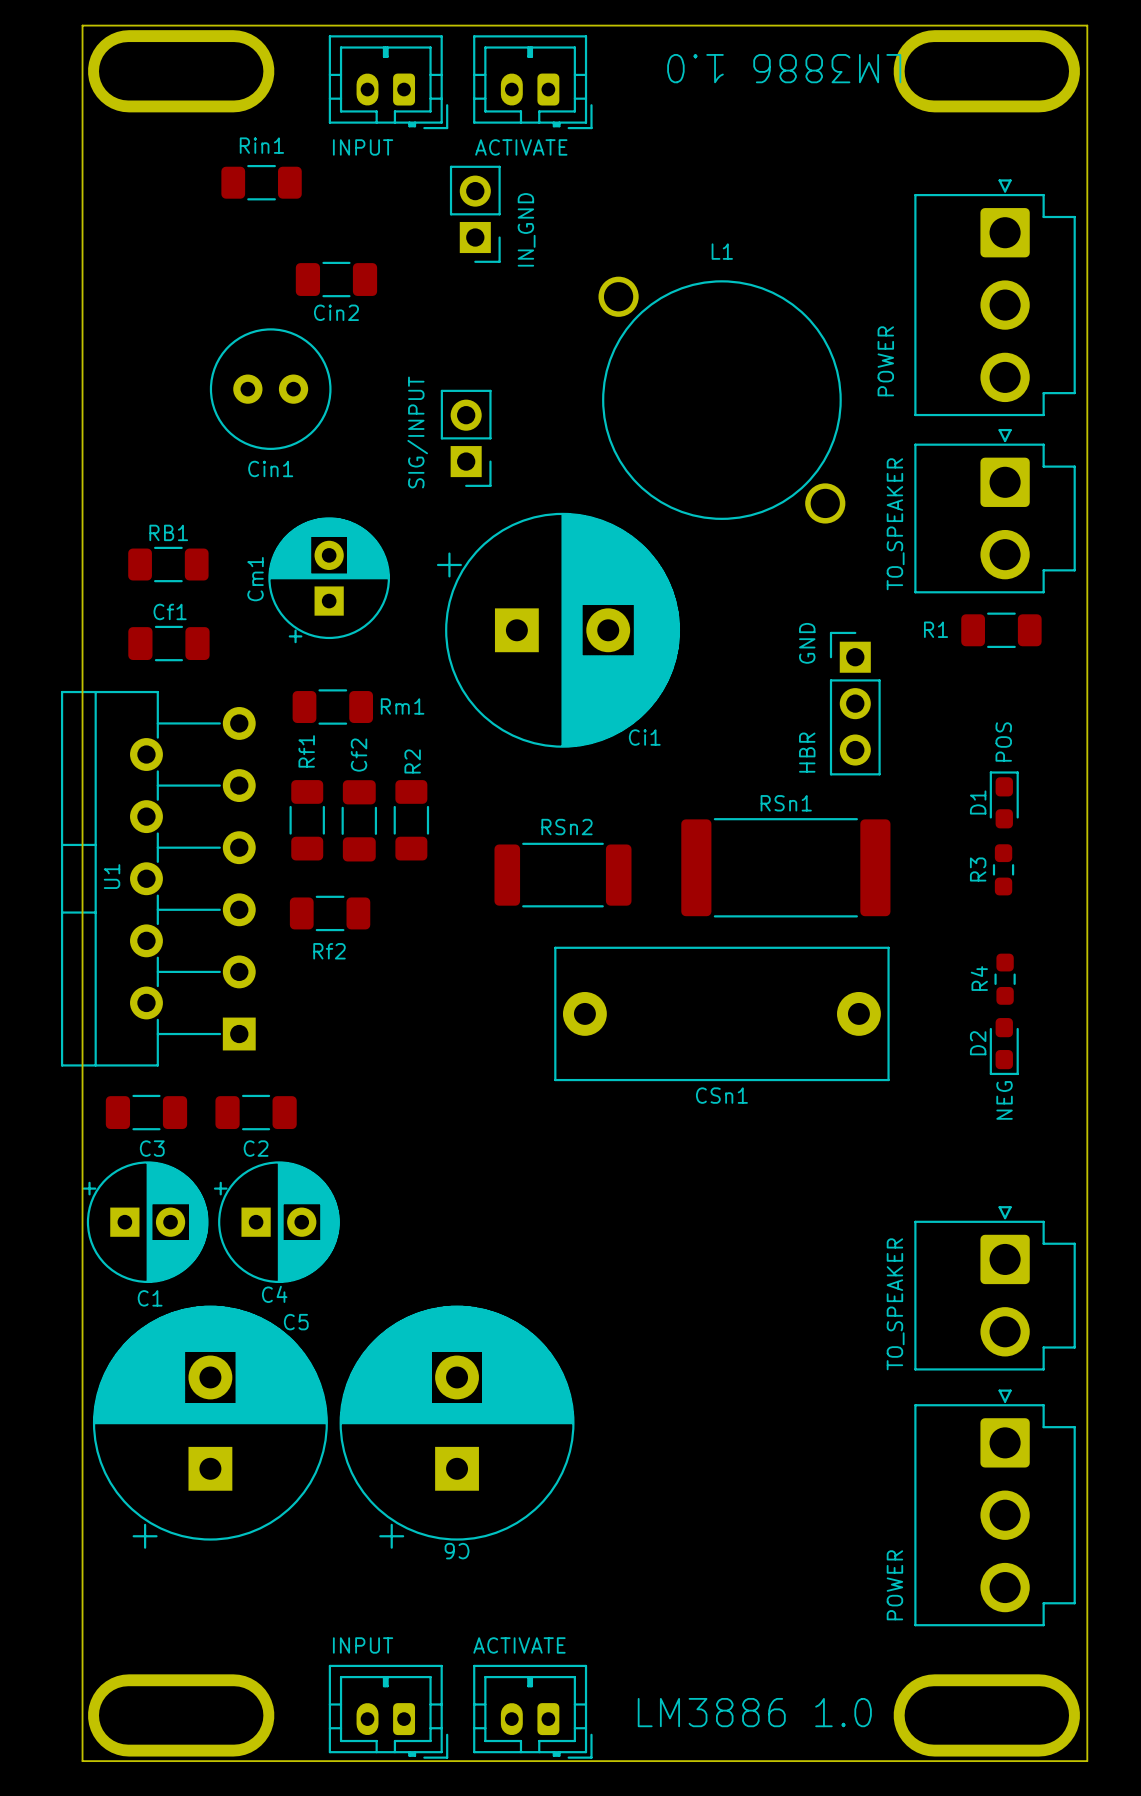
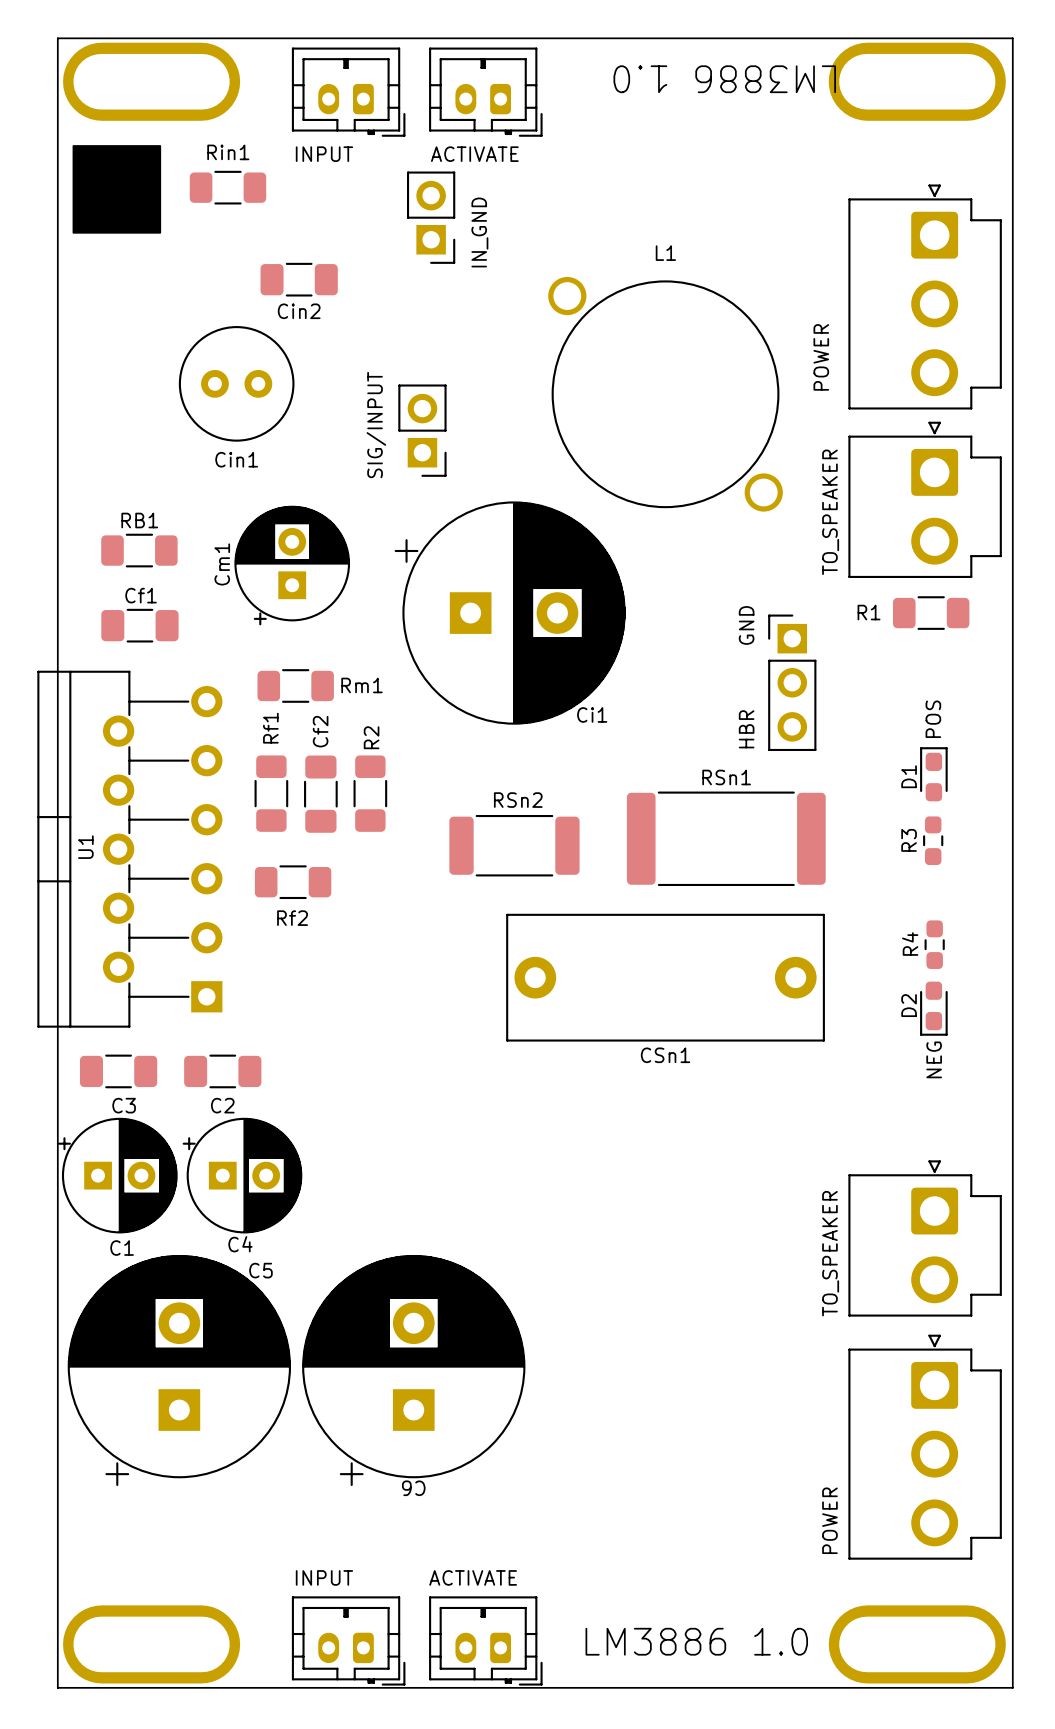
drawing: none -> [72, 145, 162, 234]

